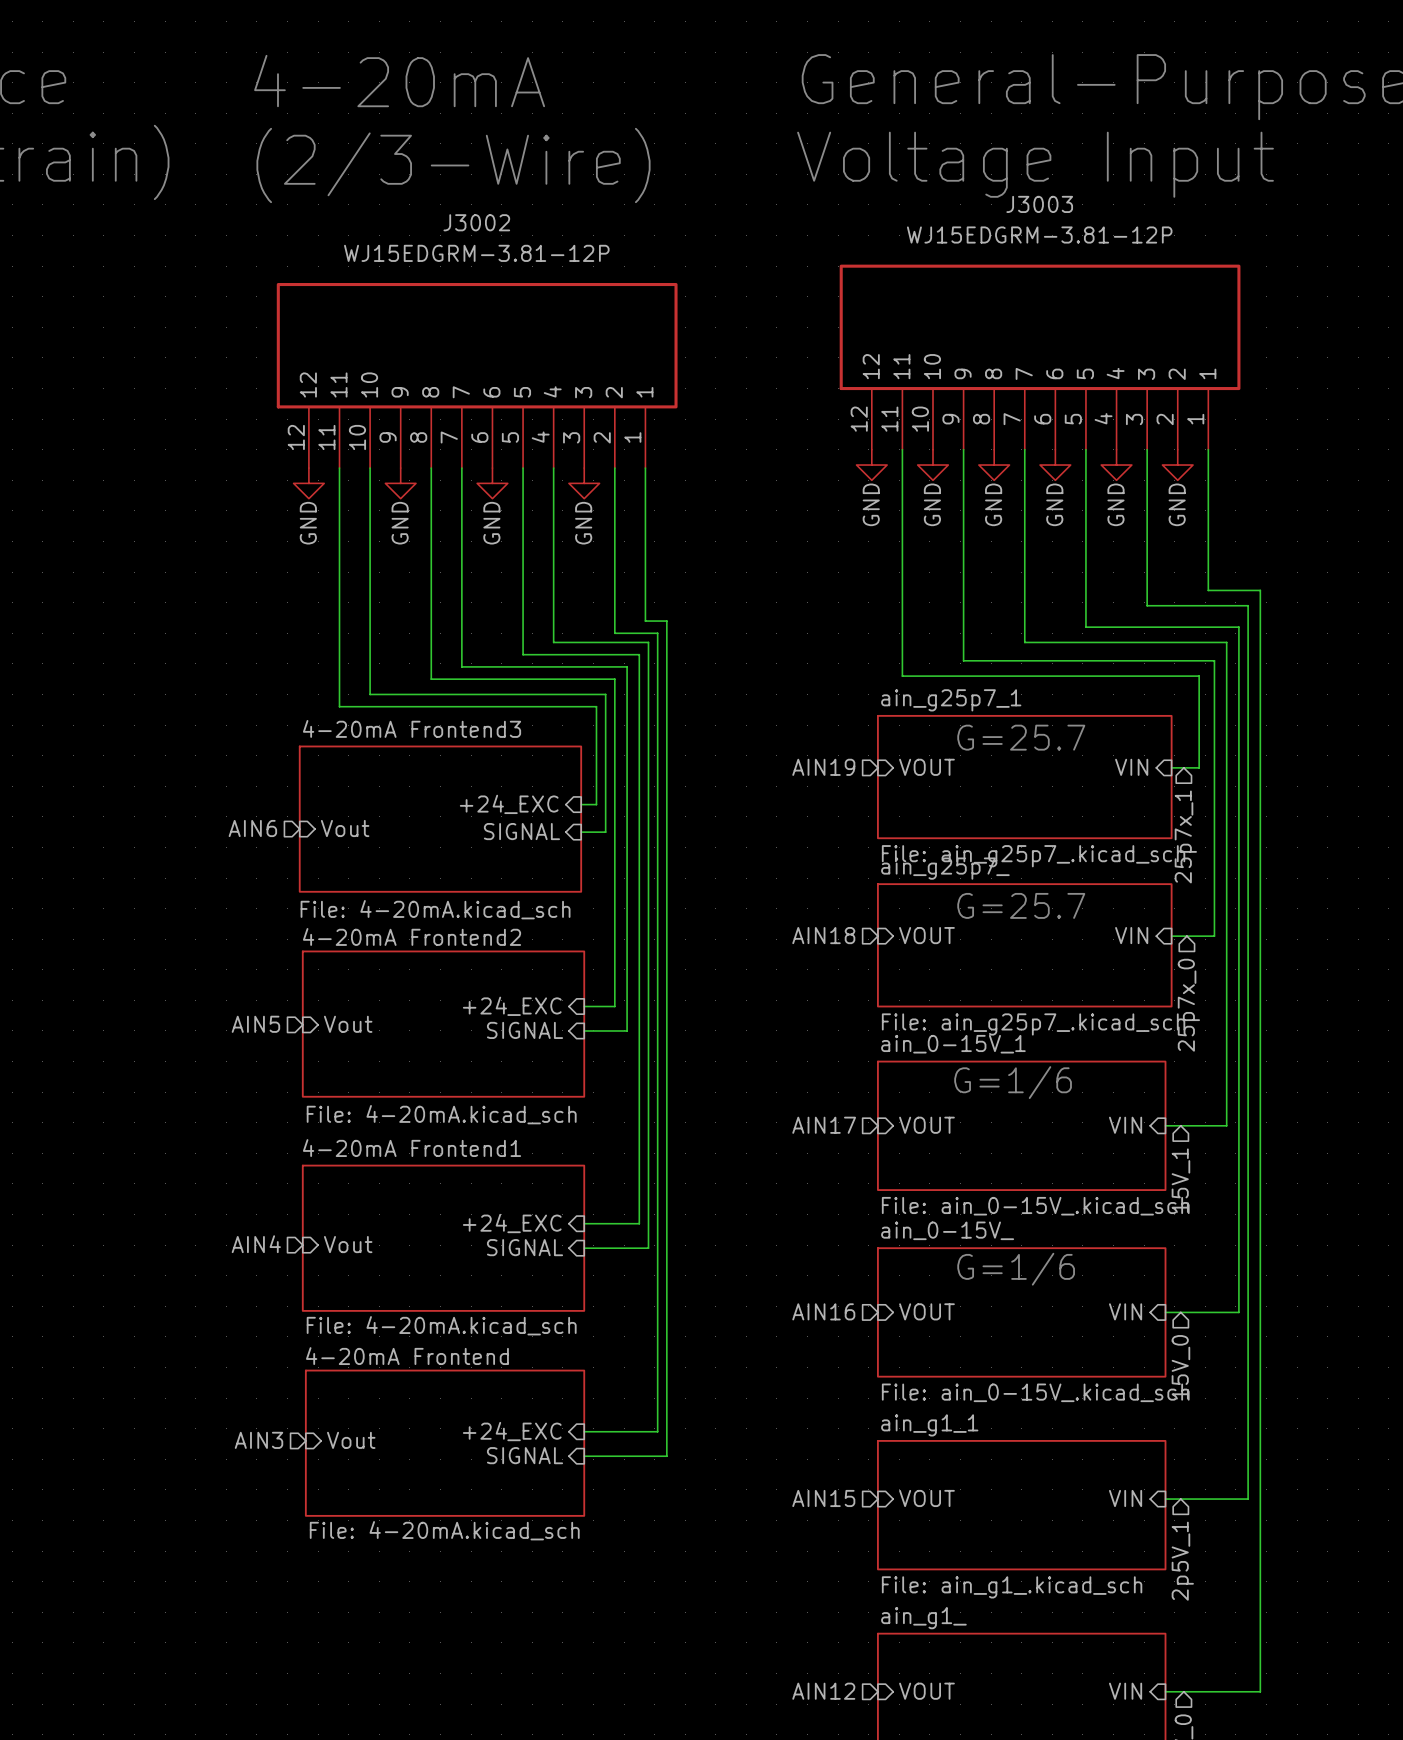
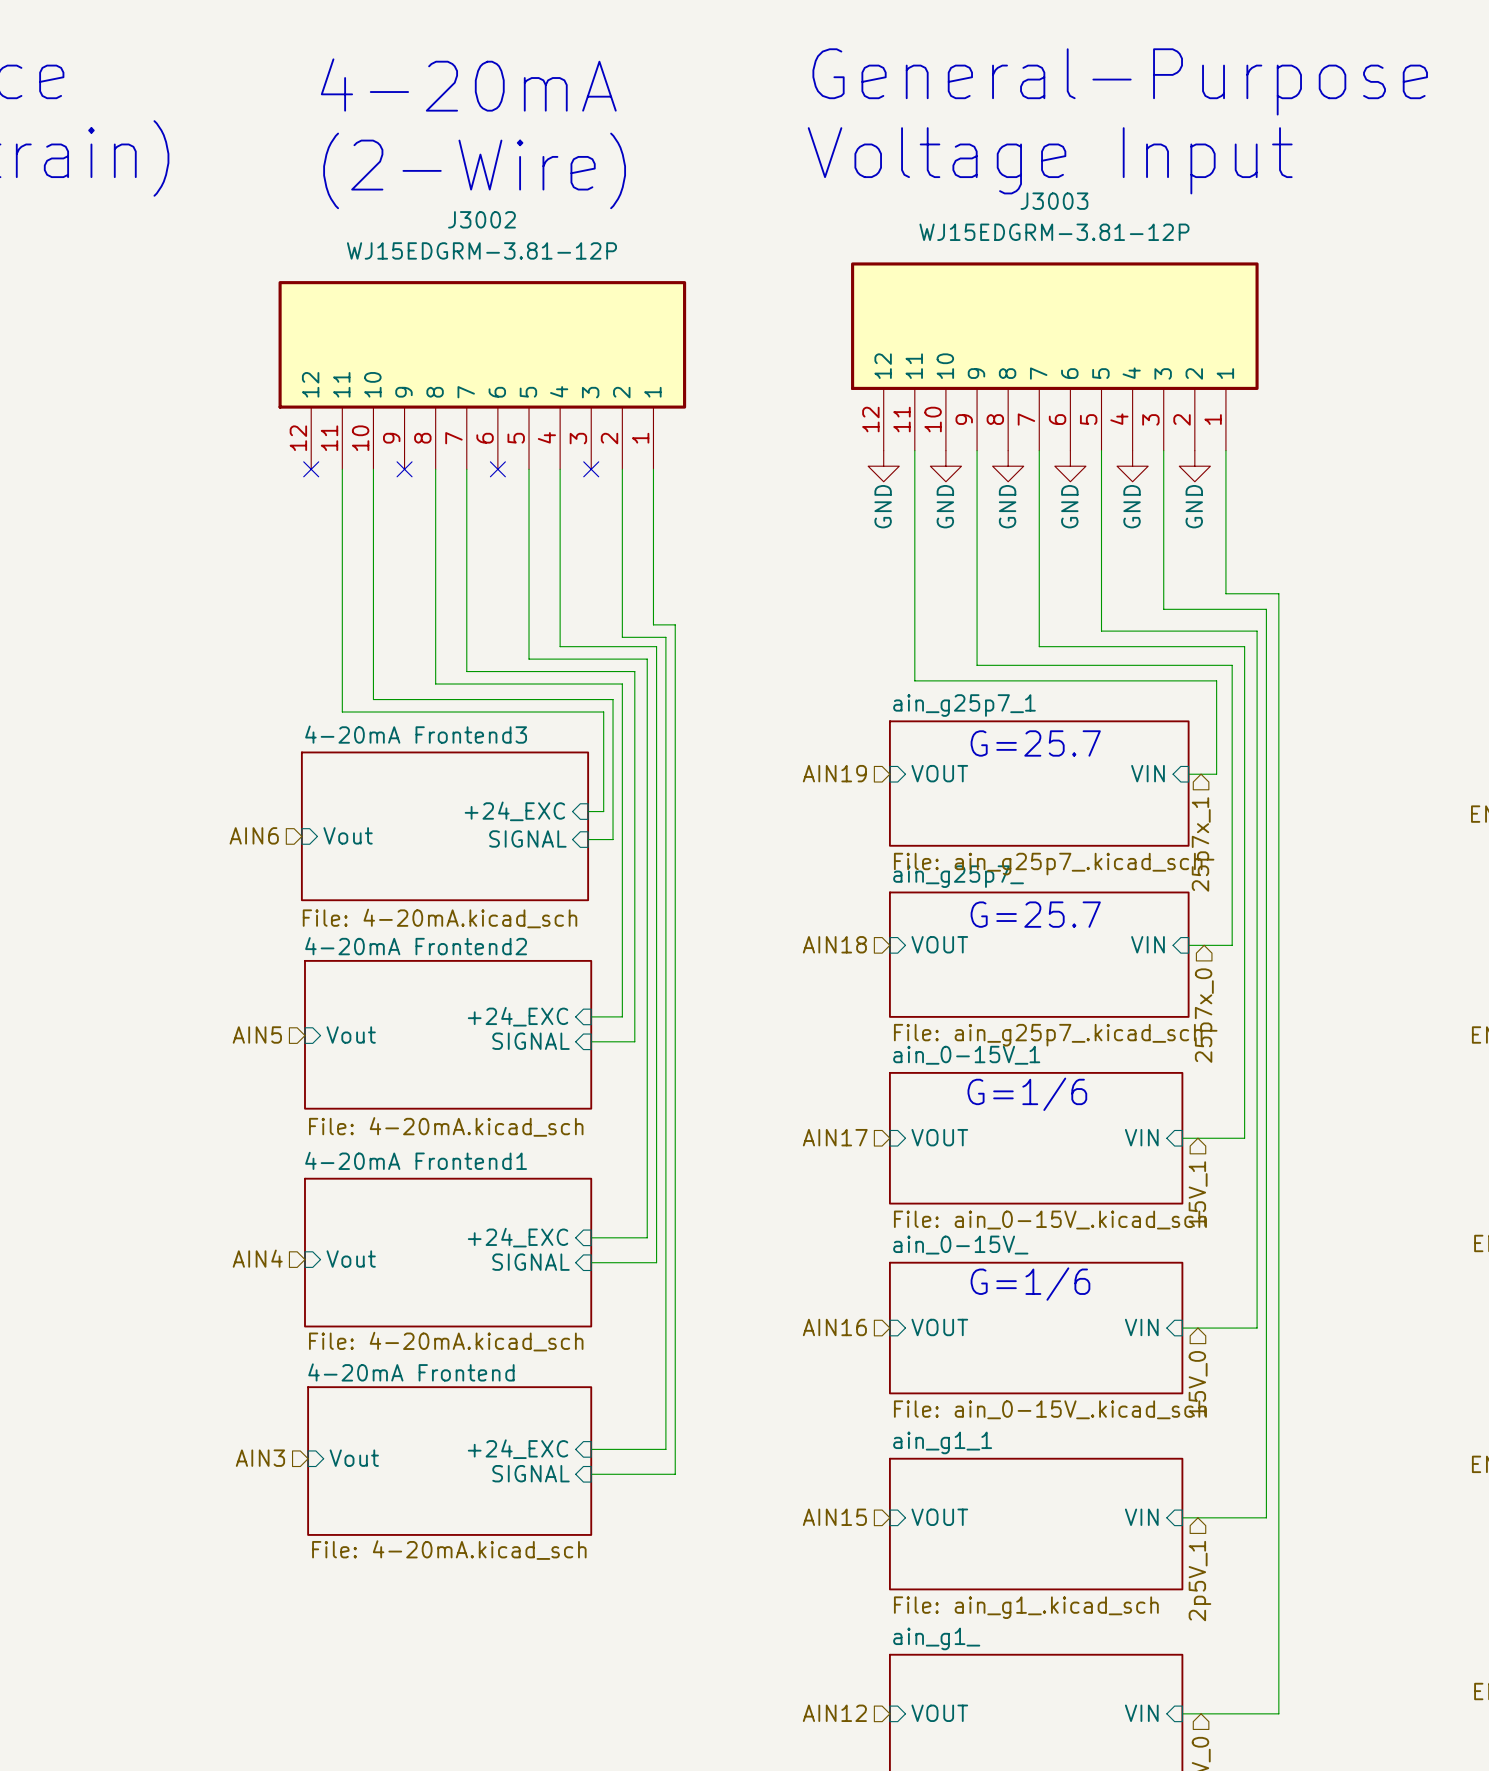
text position: 4-20mA (399, 81) -> 4-20mA (468, 85)
text: (2/3-Wire) (453, 165) -> (2-Wire) (474, 170)
no-connect mark: none -> (311, 469)
no-connect mark: none -> (404, 469)
no-connect mark: none -> (497, 469)
no-connect mark: none -> (591, 469)
power symbol: GND (308, 483) -> none
power symbol: GND (400, 483) -> none
power symbol: GND (492, 483) -> none
power symbol: GND (584, 483) -> none

